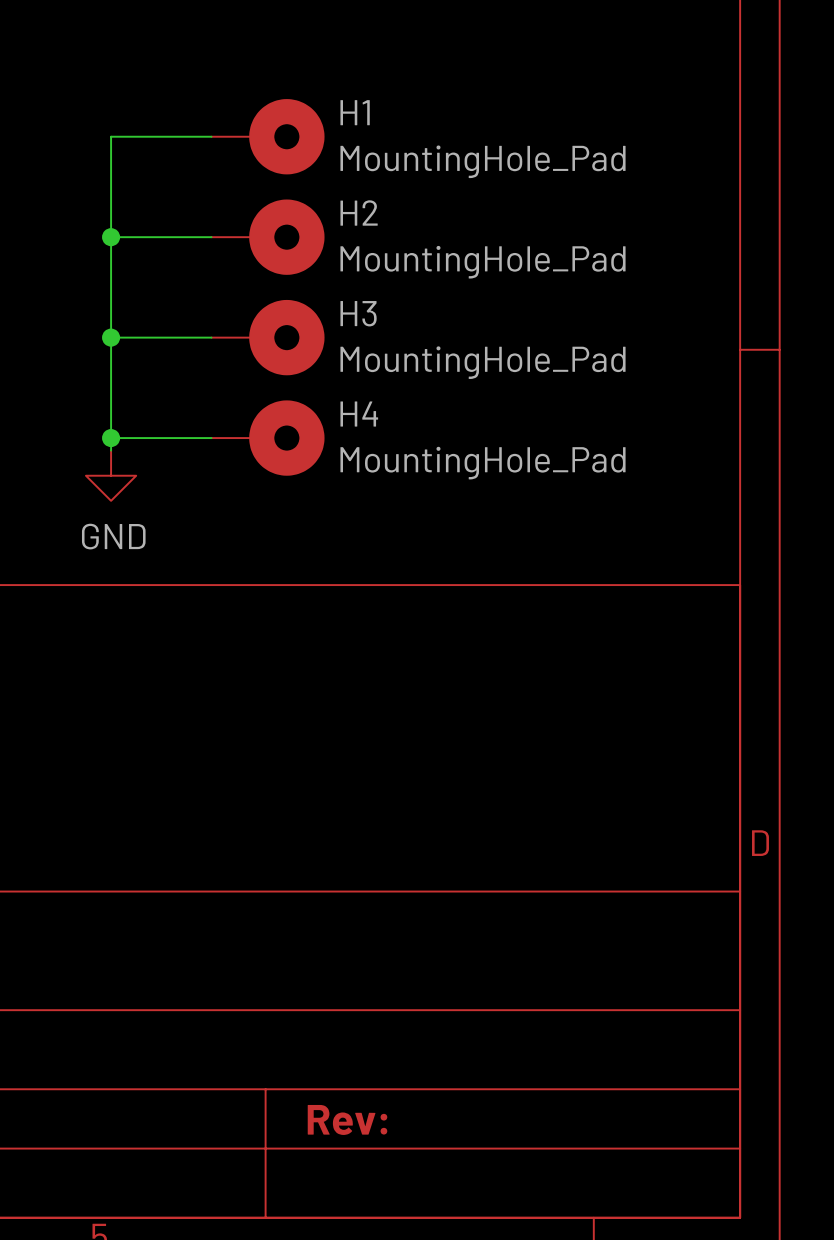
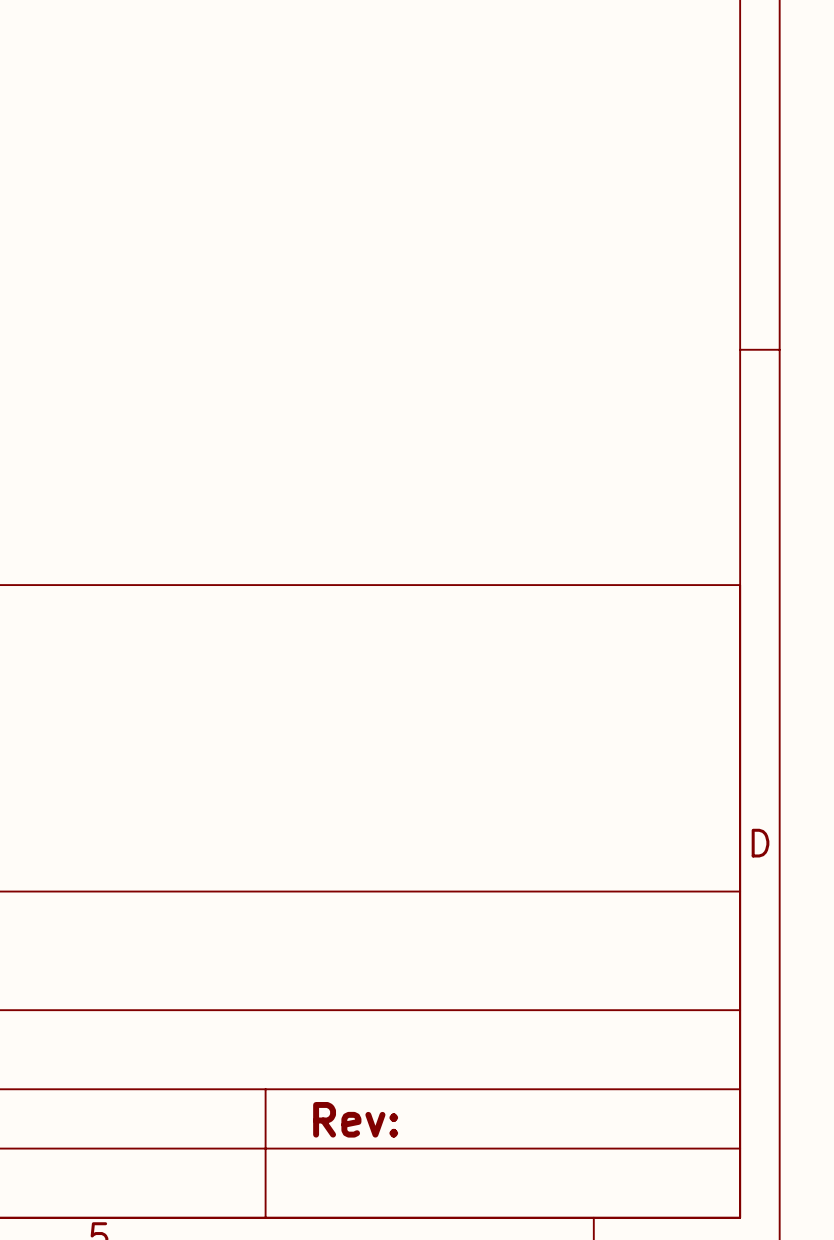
wire: (211, 136) (111, 136) (111, 450) -> none
H1: MountingHole_Pad (268, 136) -> none
wire: (111, 237) (211, 237) -> none
junction: (111, 237) -> none
H2: MountingHole_Pad (268, 237) -> none
wire: (111, 337) (211, 337) -> none
junction: (111, 337) -> none
H3: MountingHole_Pad (268, 337) -> none
wire: (111, 438) (211, 438) -> none
junction: (111, 438) -> none
H4: MountingHole_Pad (268, 438) -> none
power symbol: GND (111, 475) -> none

